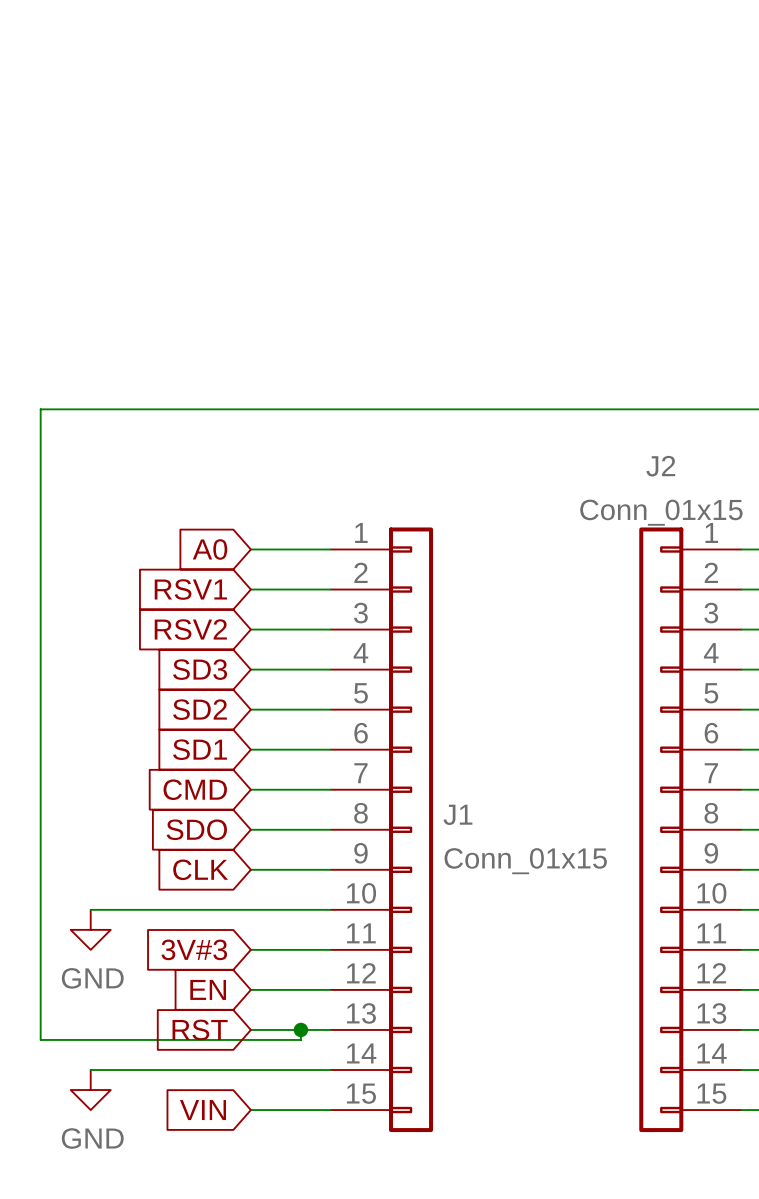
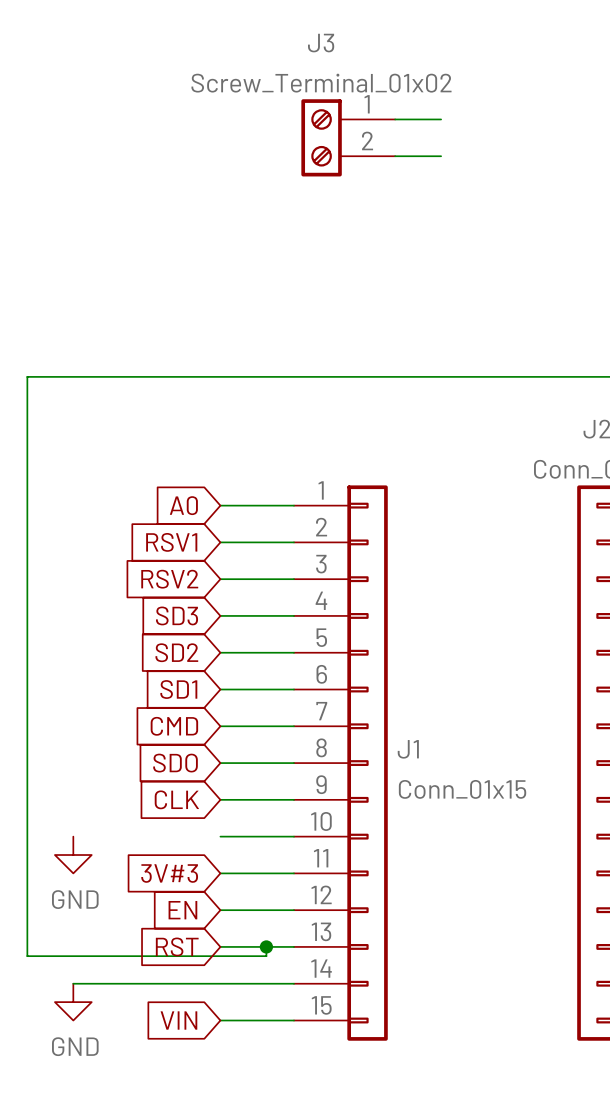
wire: none -> (395, 119) (441, 119)
J3: none -> Screw_Terminal_01x02 (348, 137)
wire: none -> (395, 156) (441, 156)
wire: (90, 909) (250, 909) -> none

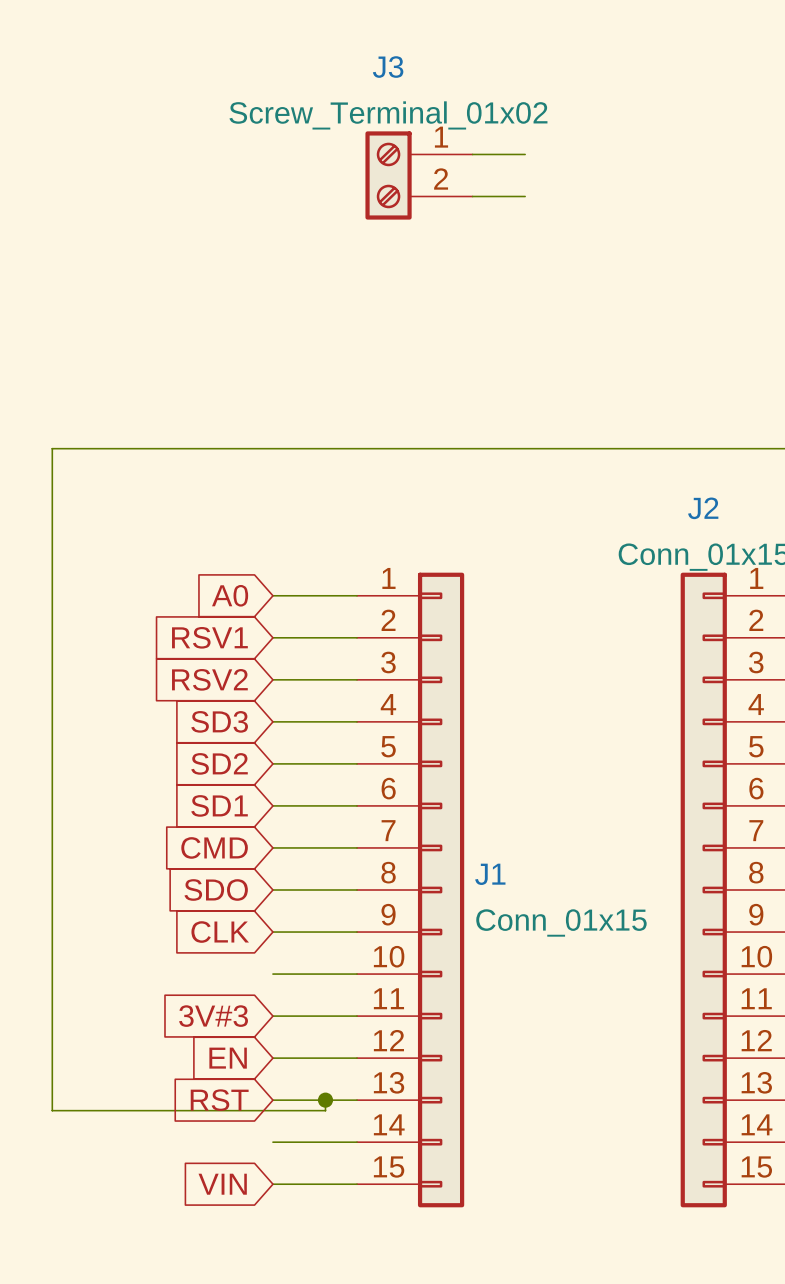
power symbol: GND (73, 855) -> none
wire: (73, 983) (220, 983) -> none
power symbol: GND (73, 1002) -> none

